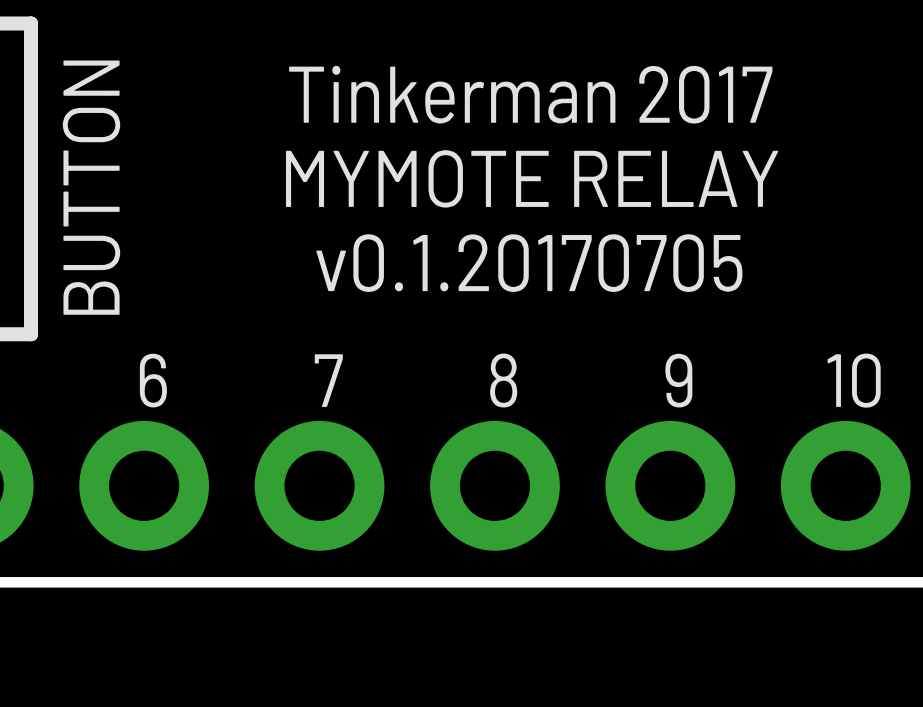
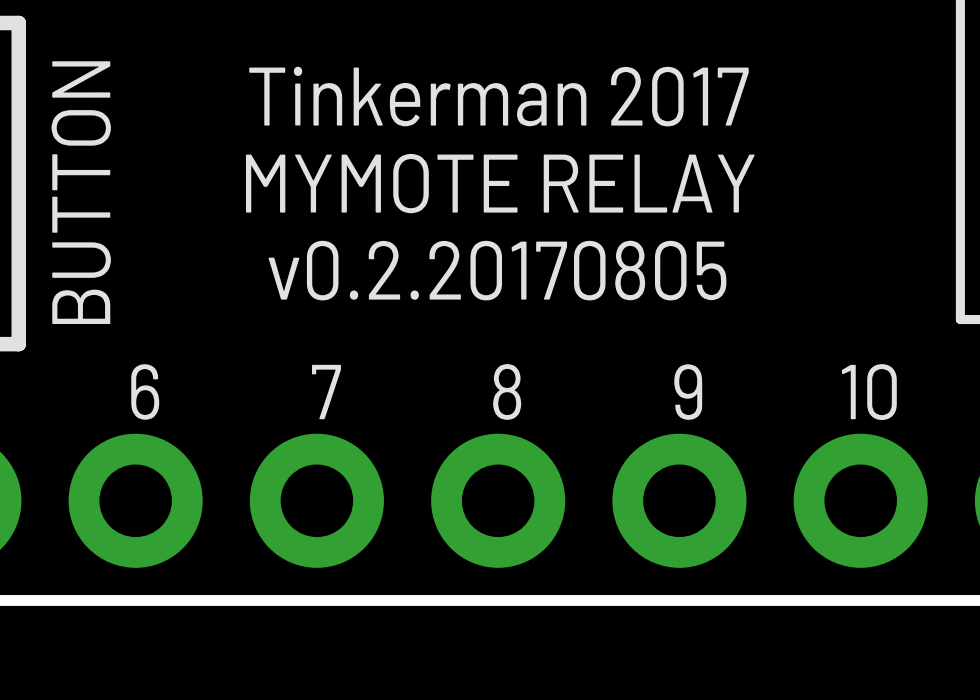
text position: Tinkerman 2017 (530, 94) -> Tinkerman 2017 (498, 96)
text position: MYMOTE RELAY (532, 178) -> MYMOTE RELAY (500, 183)
text: v0.1.20170705 (529, 263) -> v0.2.20170805 (497, 270)

